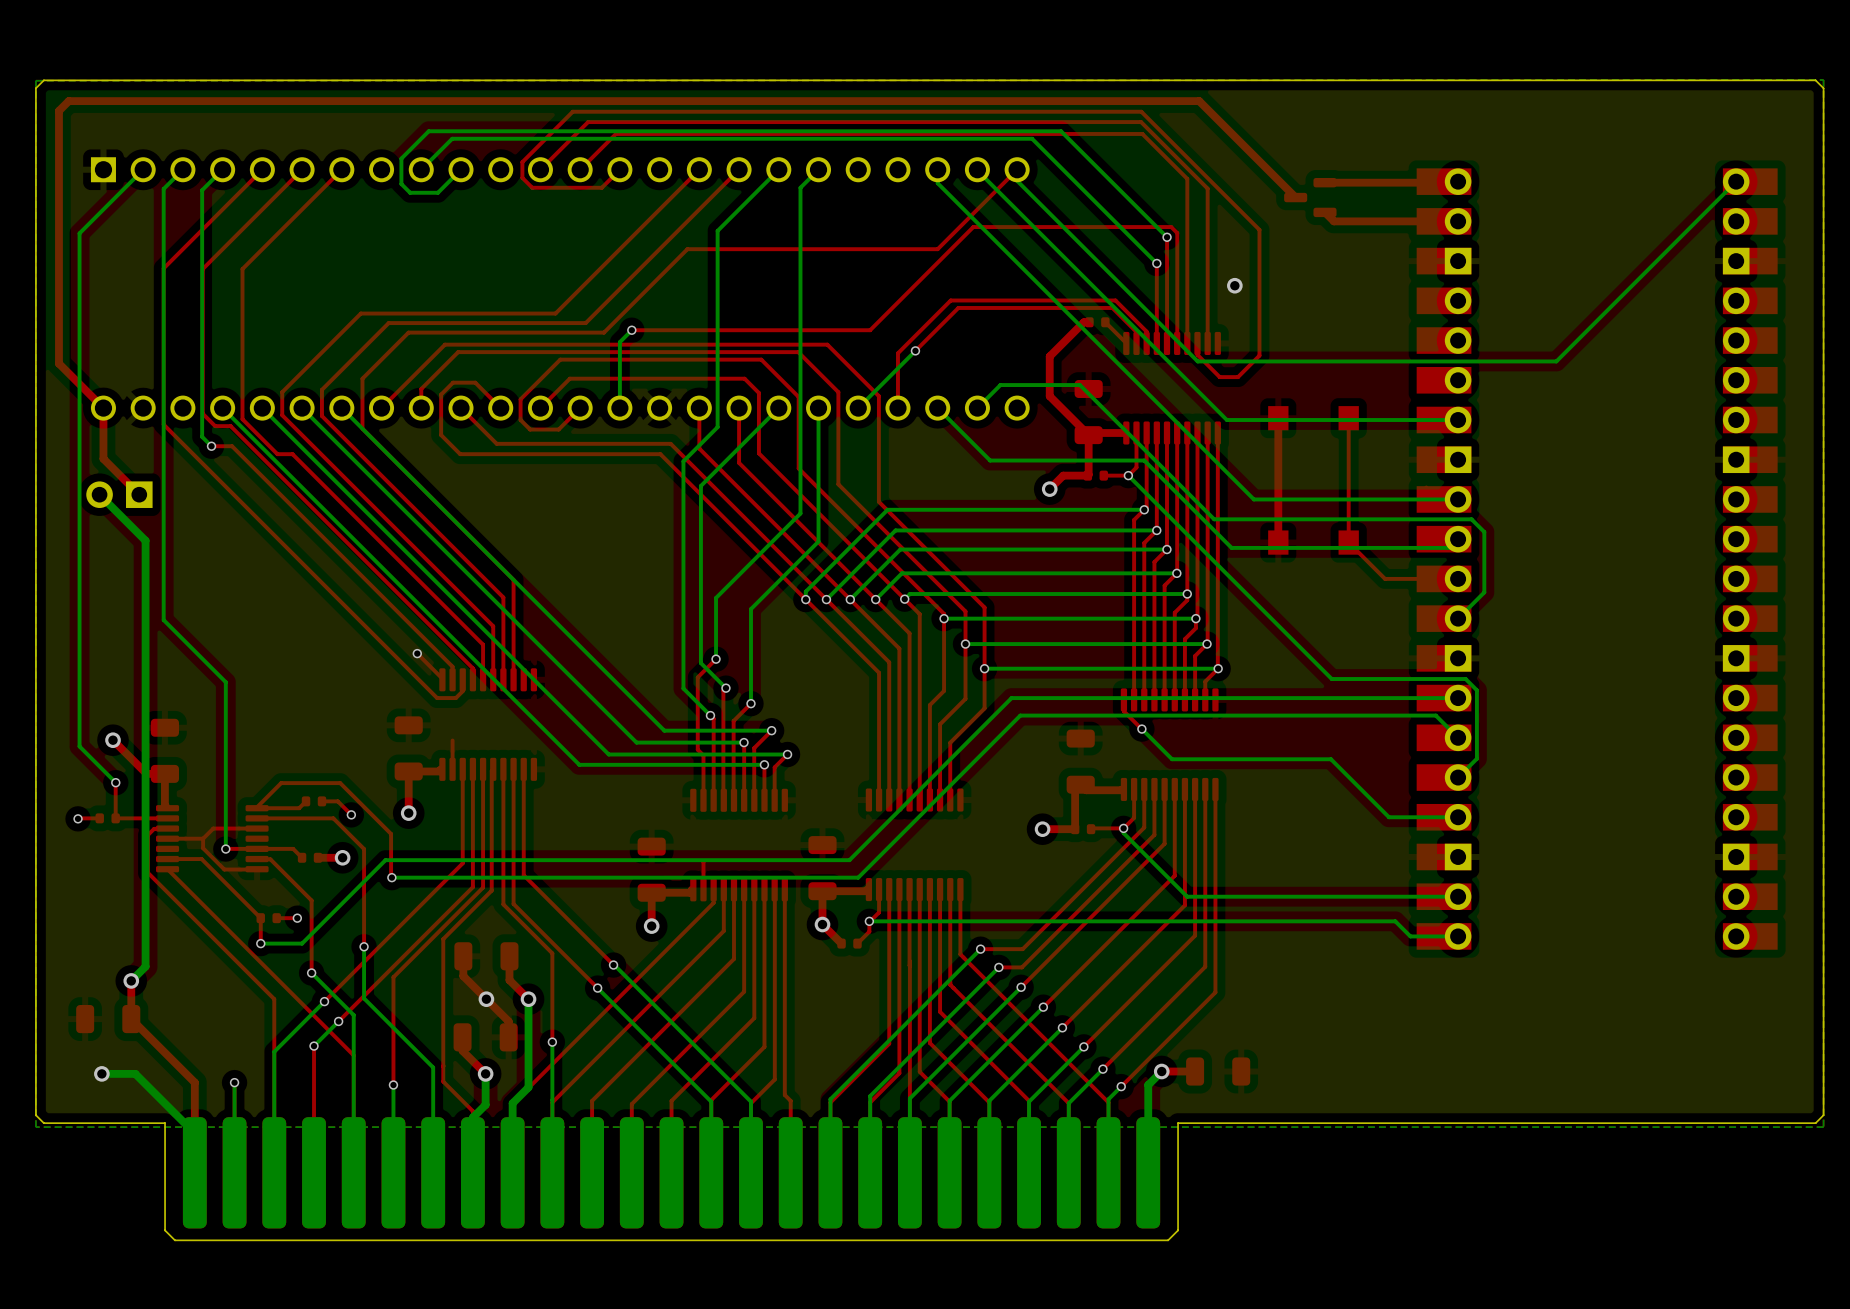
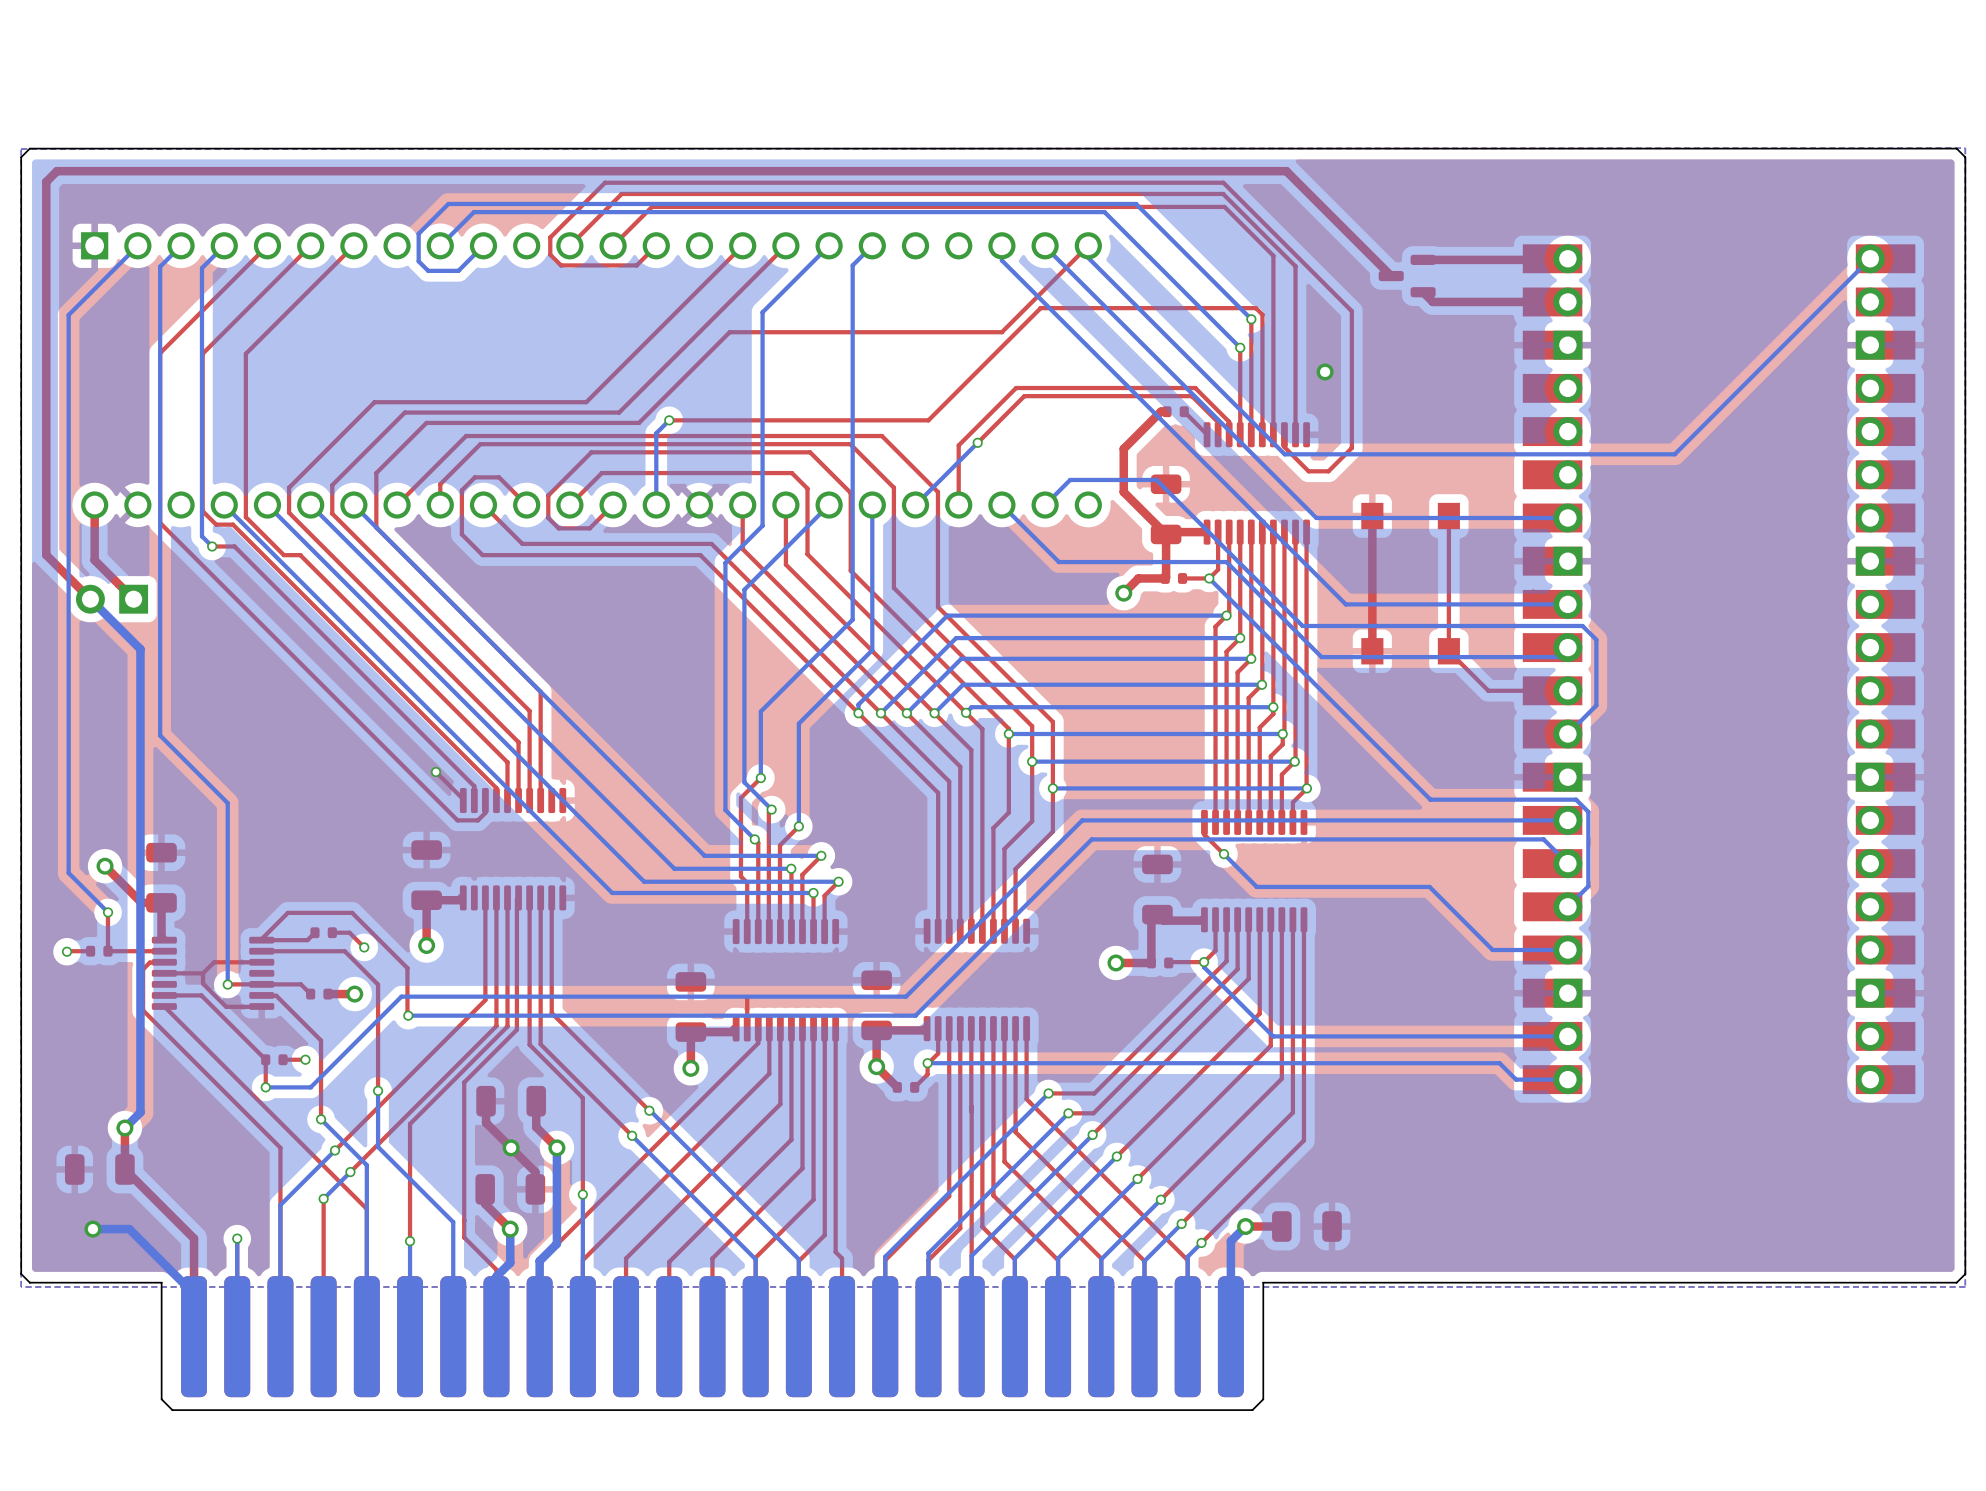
top track: (58, 363) (103, 408) -> (46, 456) (46, 555) (90, 599)
top track: (452, 740) (452, 769) -> none

